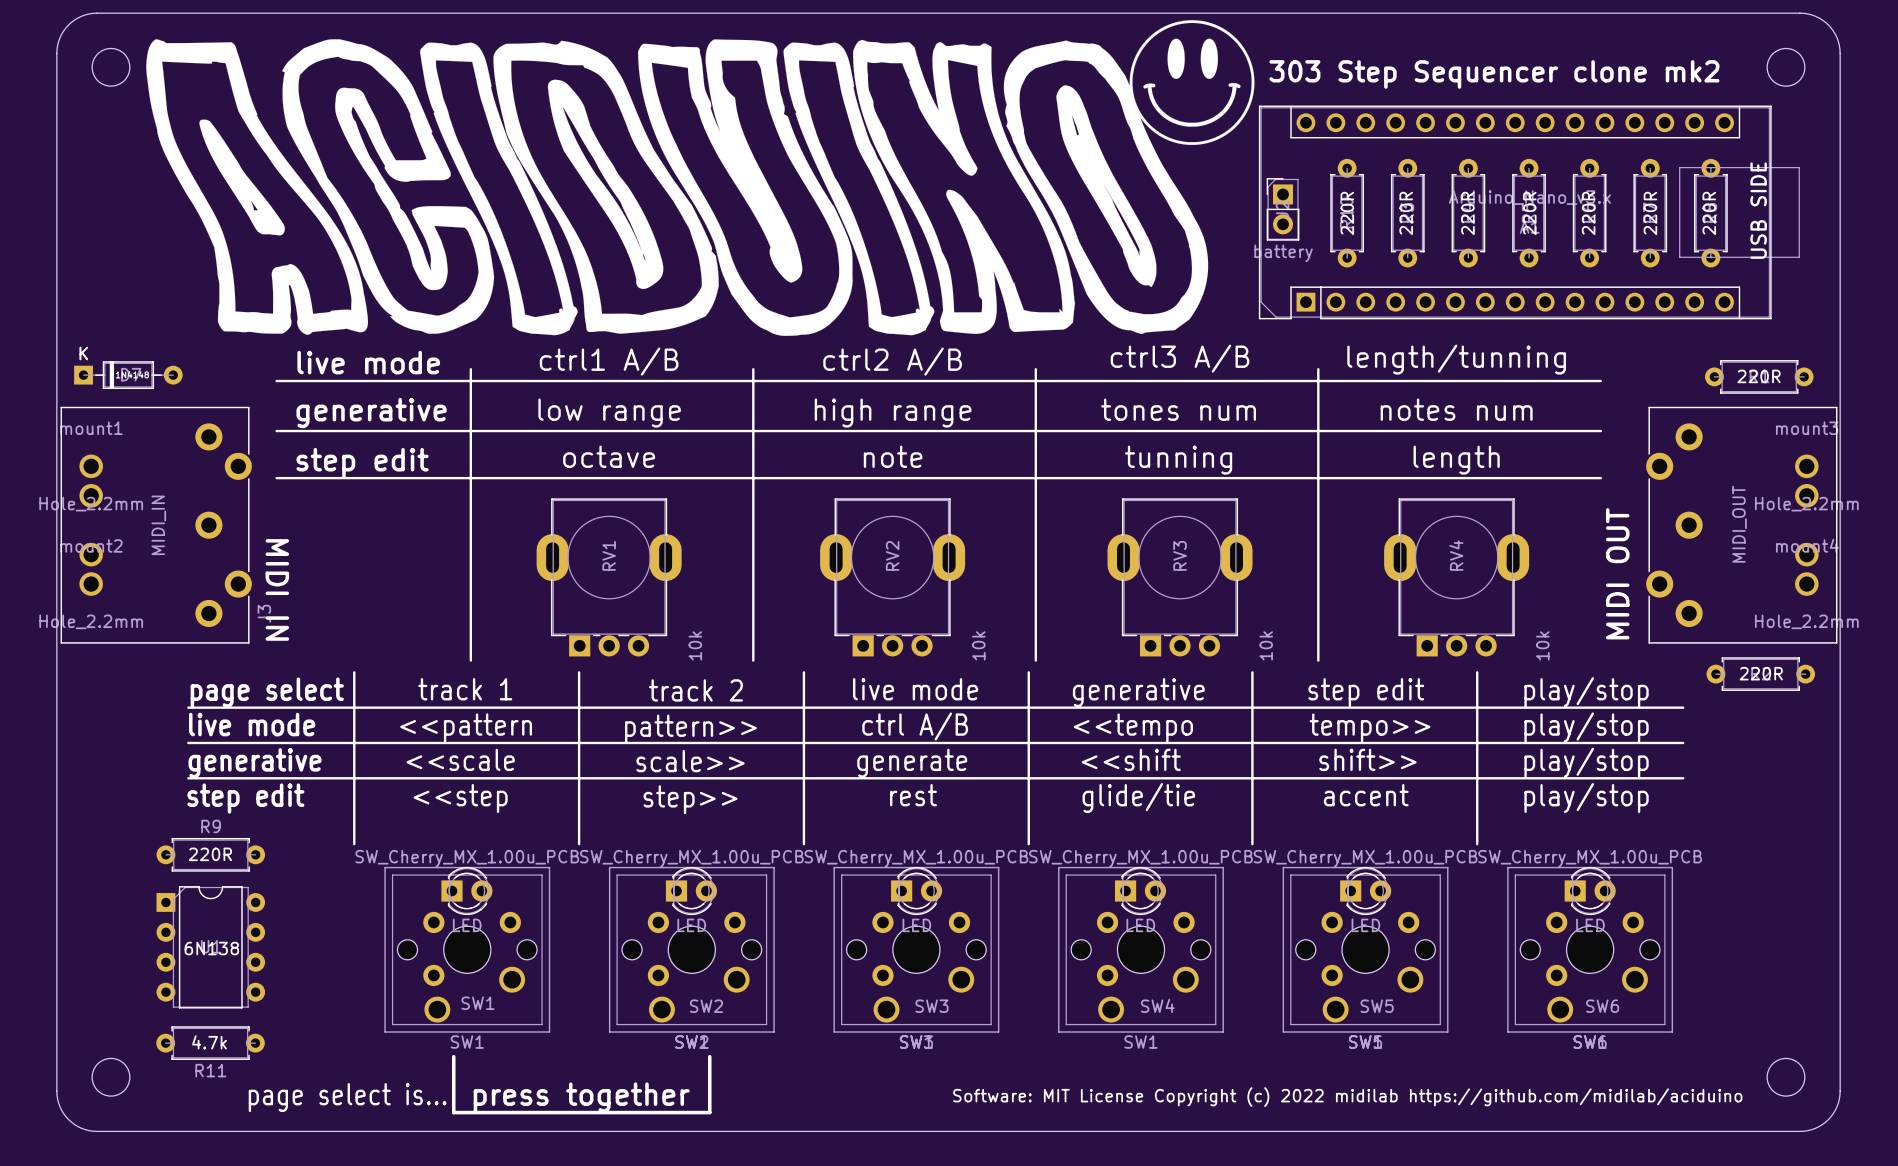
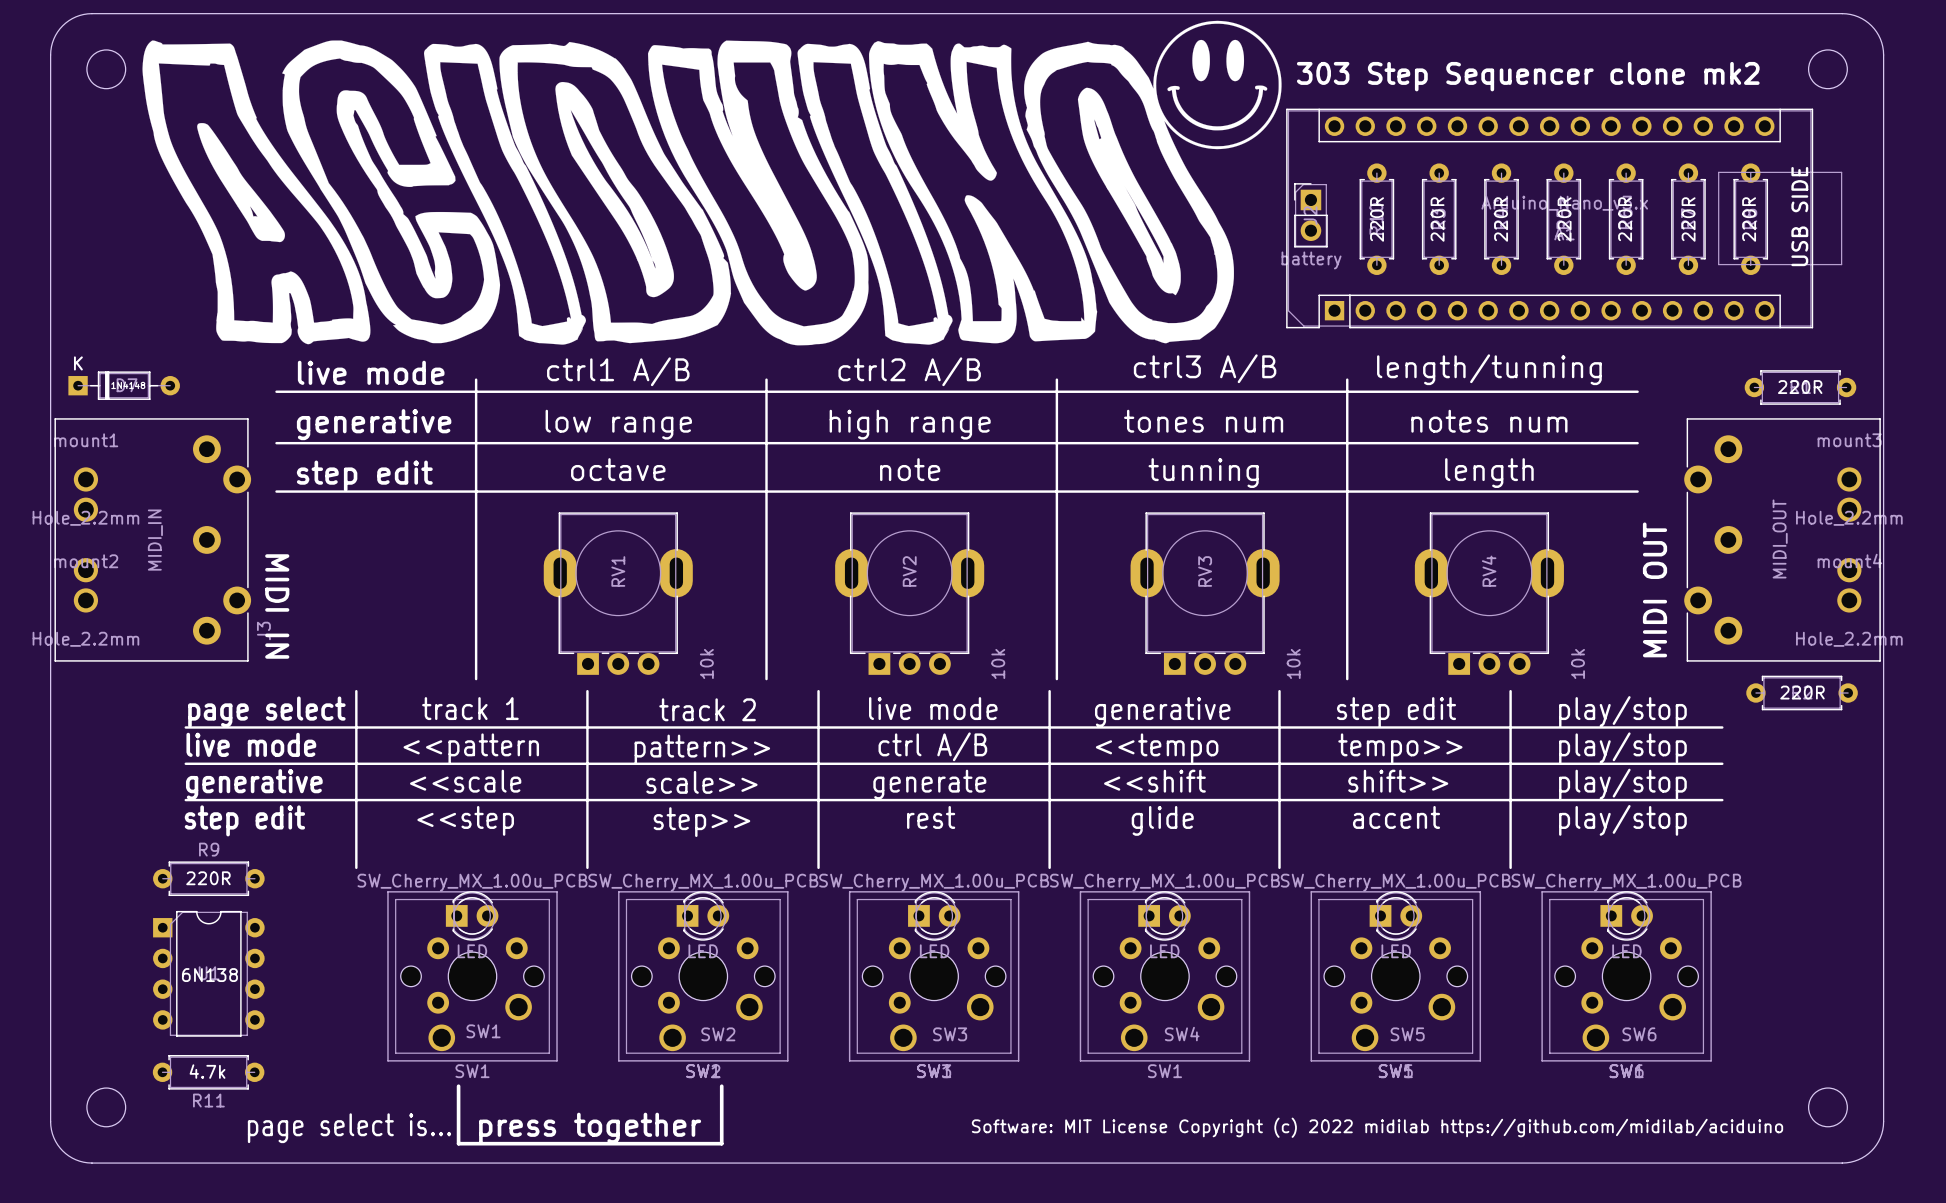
text: glide/tie (1138, 798) -> glide (1162, 820)

